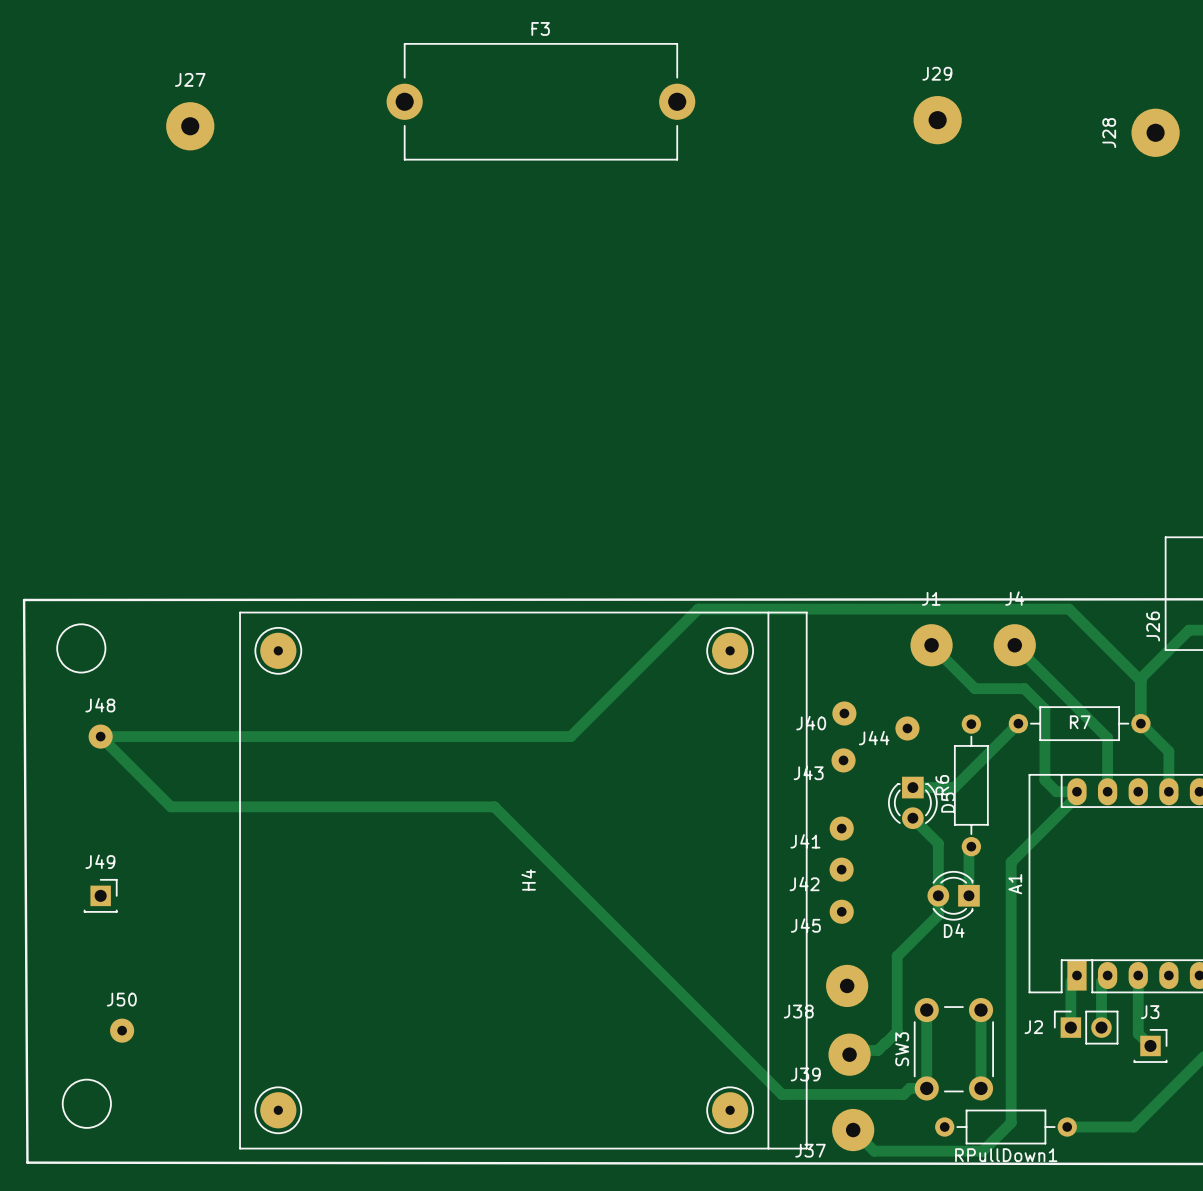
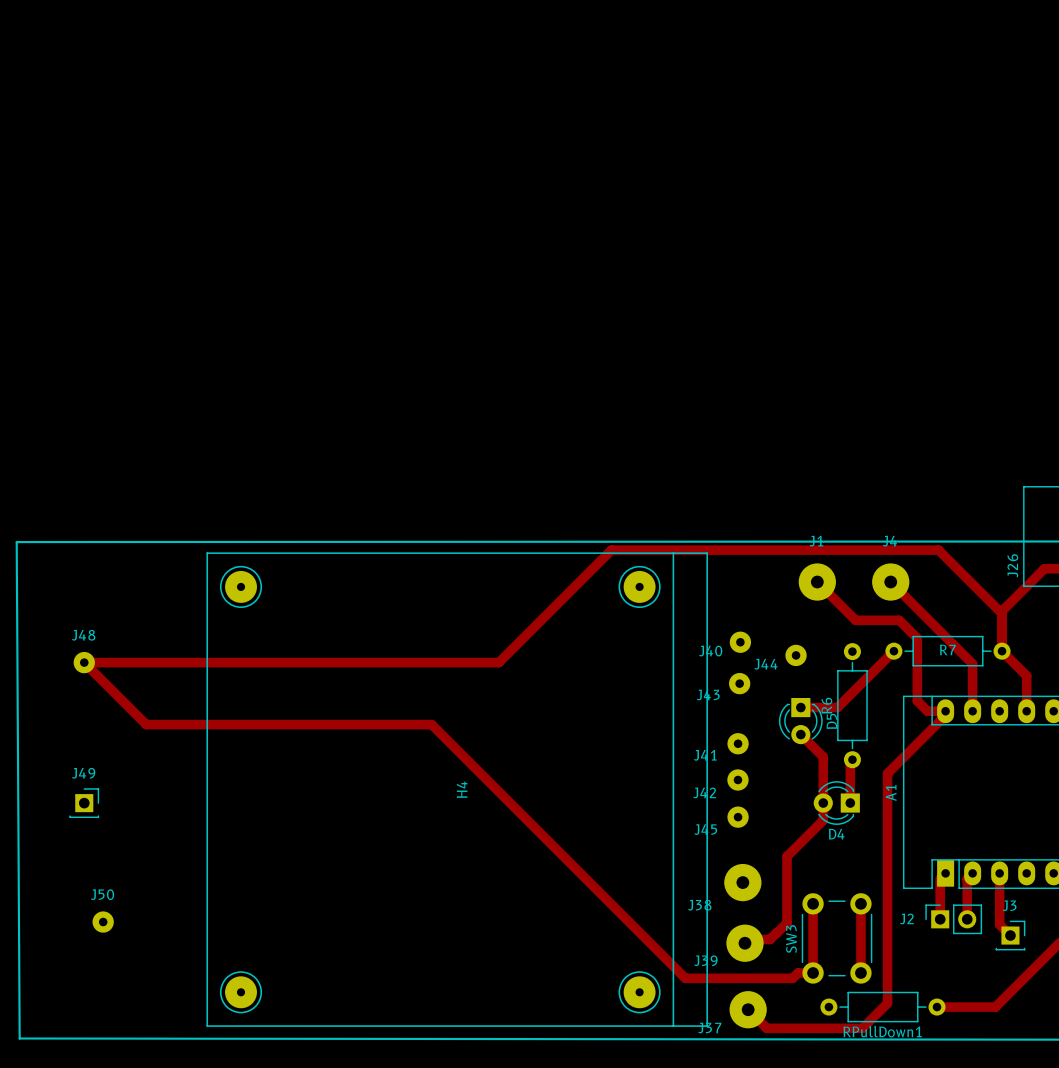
F3: (540, 101) -> none
J29: (937, 120) -> none
J27: (190, 126) -> none
J28: (1155, 132) -> none
drawing: [56, 623, 107, 674] -> none
drawing: [61, 1078, 112, 1129] -> none

